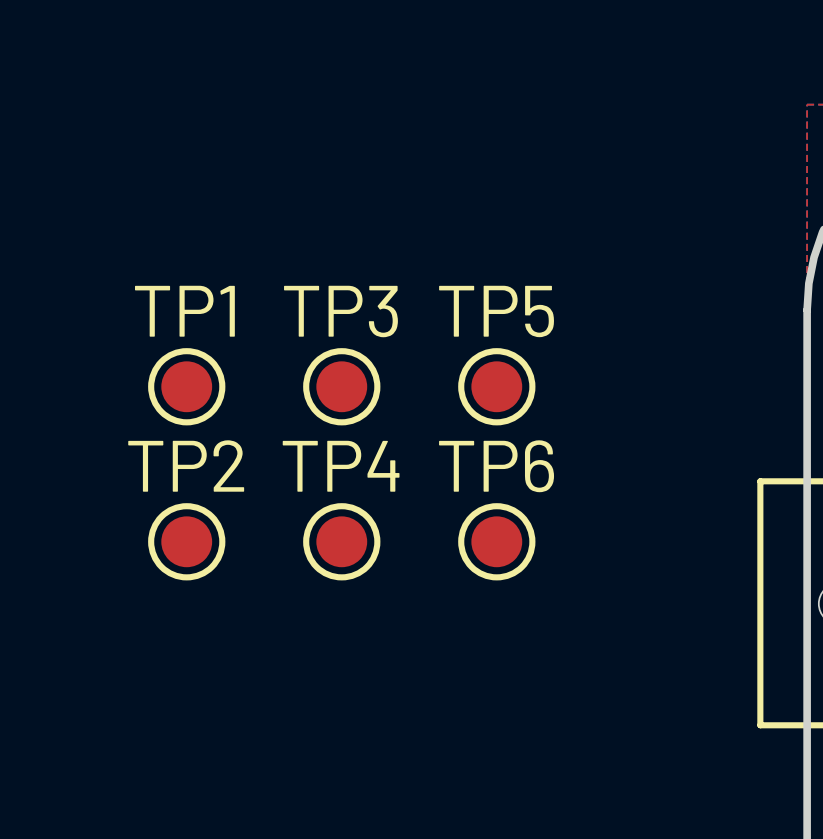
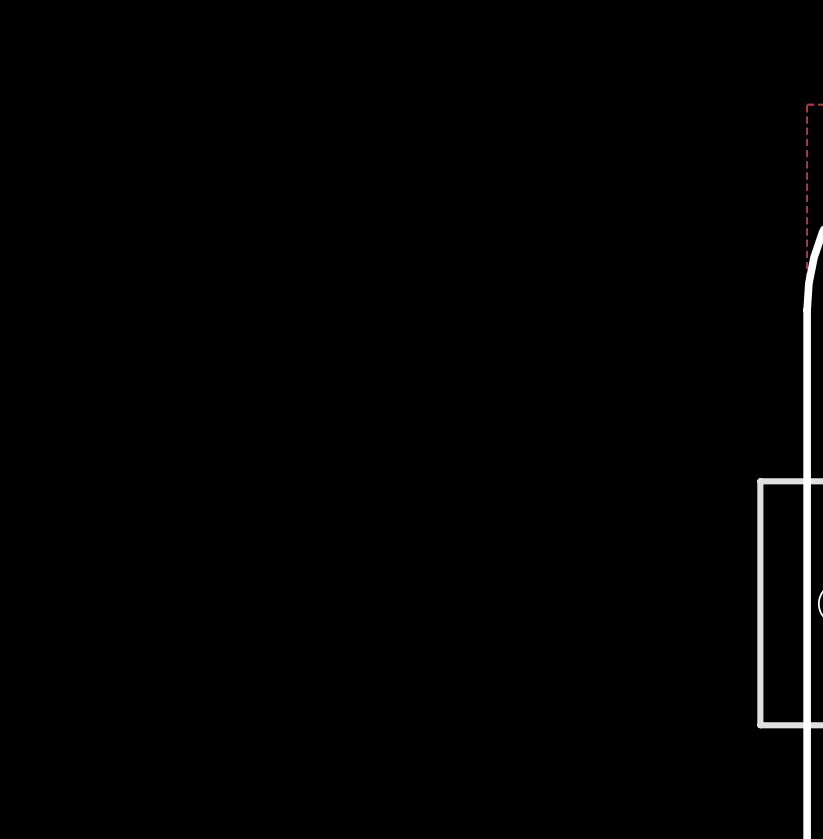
TP1: (186, 386) -> none
TP3: (341, 386) -> none
TP5: (496, 386) -> none
TP2: (186, 541) -> none
TP4: (341, 541) -> none
TP6: (496, 541) -> none

